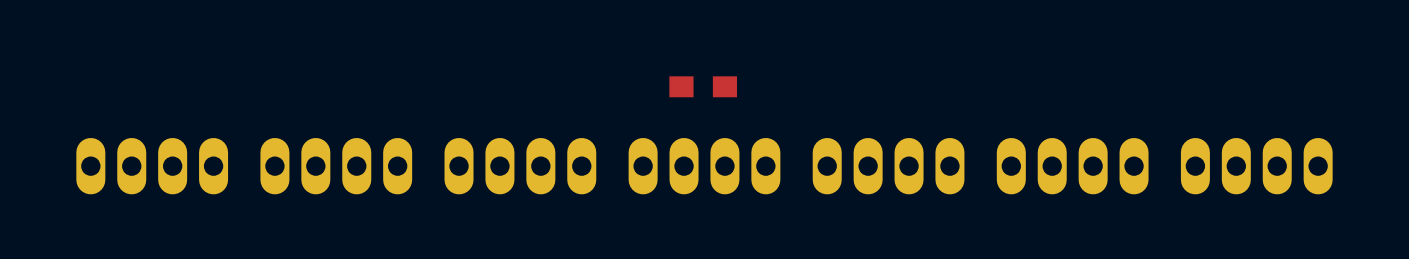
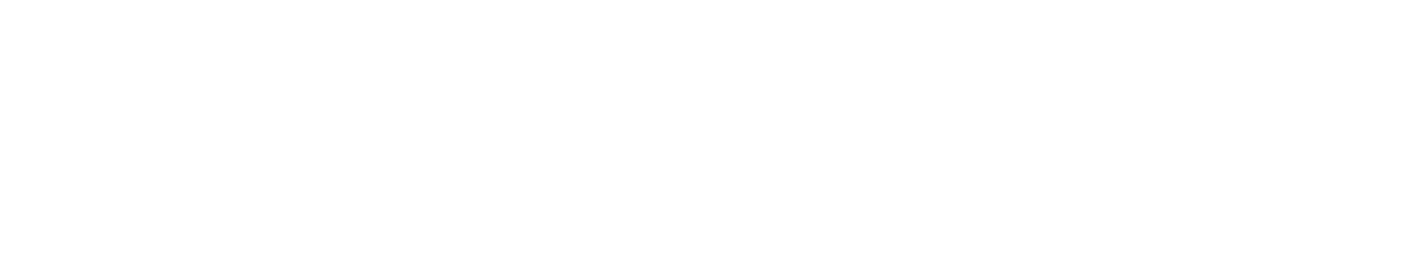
part: (703, 86) -> none
part: (152, 166) -> none
part: (336, 166) -> none
part: (520, 166) -> none
part: (704, 166) -> none
part: (888, 166) -> none
part: (1072, 166) -> none
part: (1256, 166) -> none

